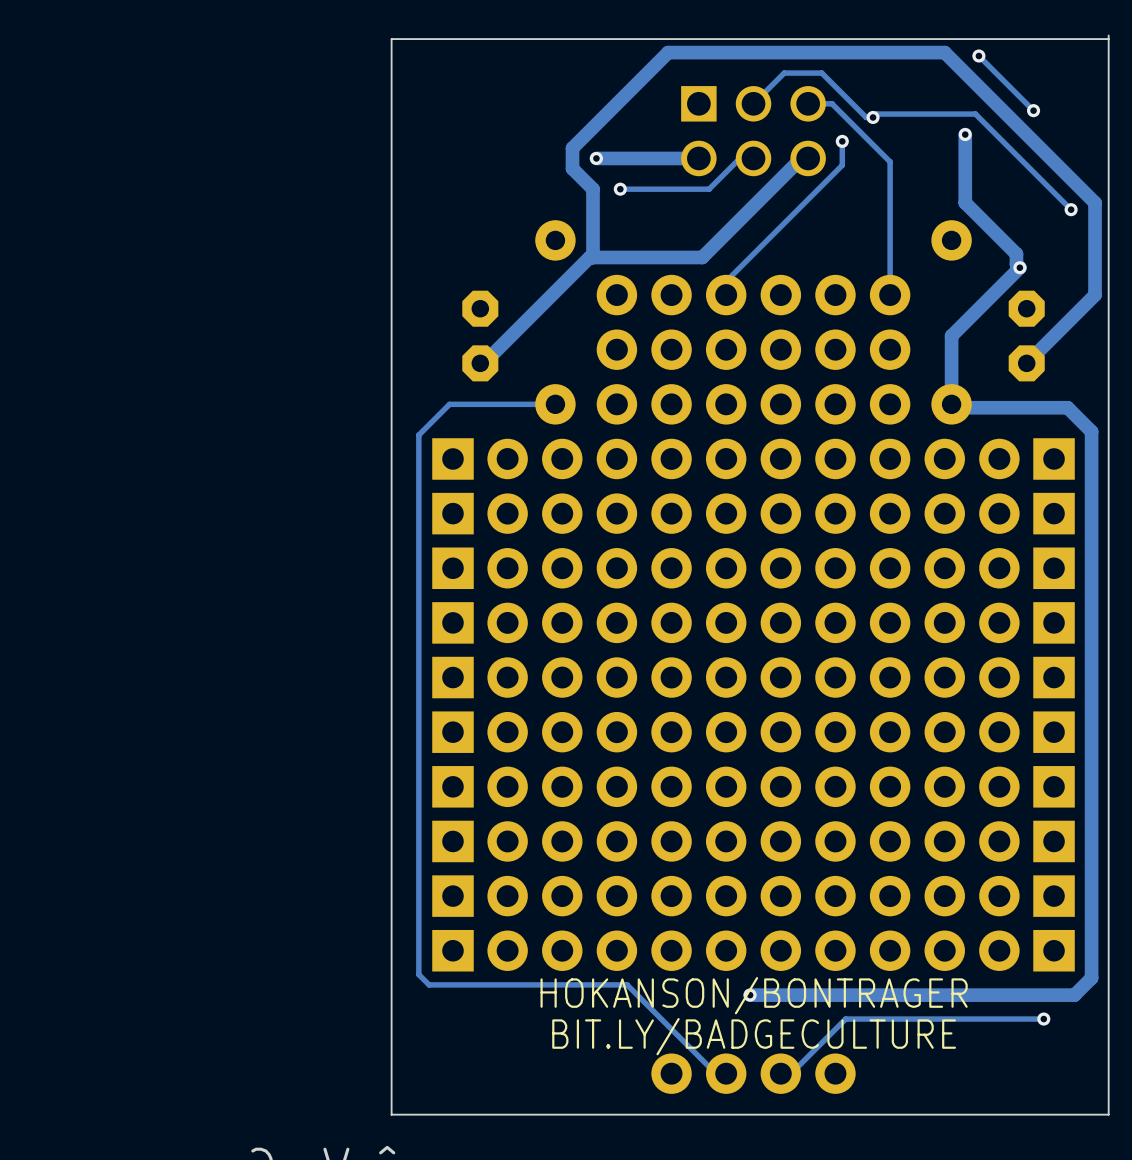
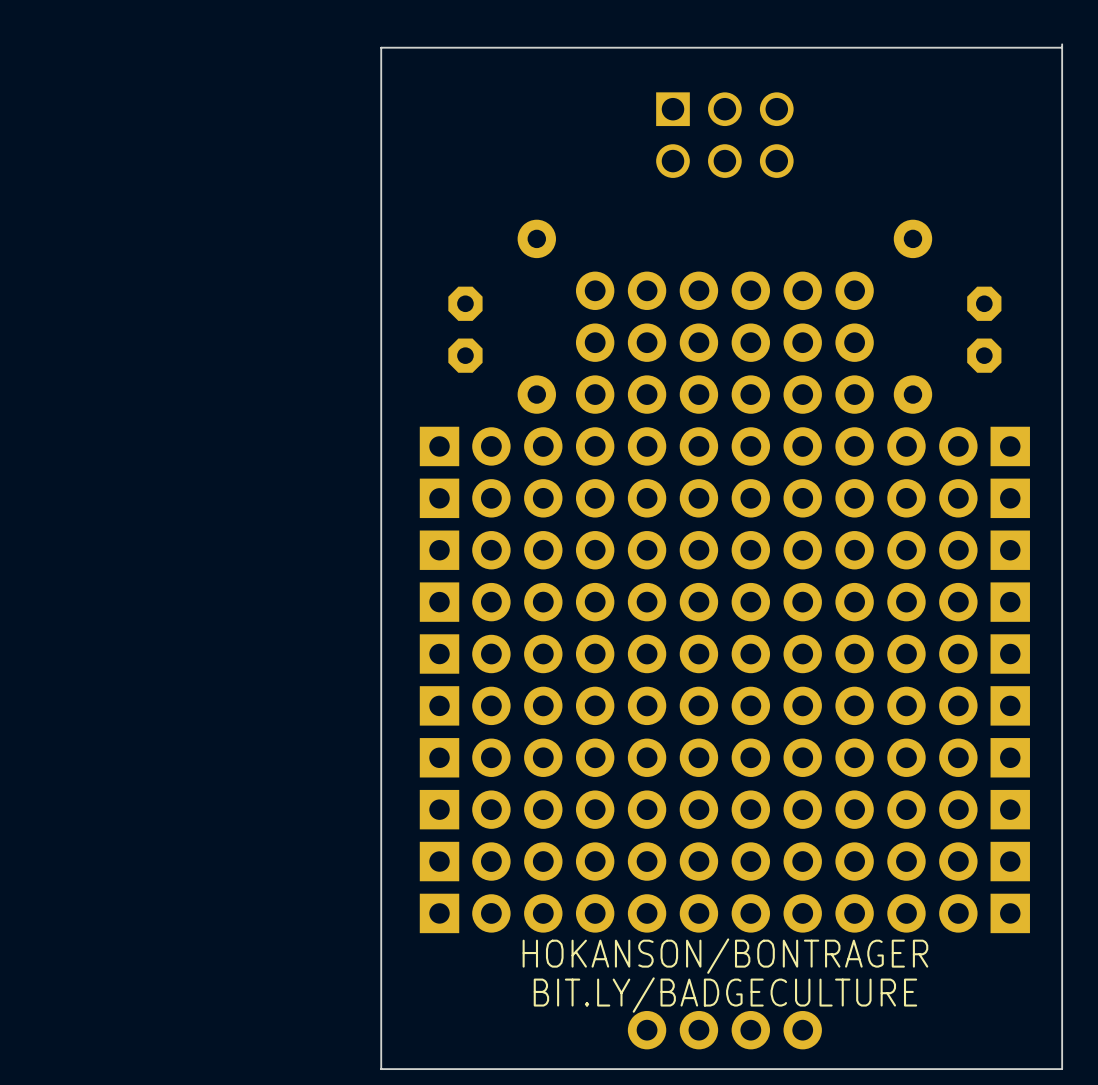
track: (978, 56) (1033, 110) -> none
via: (978, 56) -> none
track: (753, 103) (784, 73) (821, 73) (866, 117) (873, 117) (876, 114) (975, 114) (1071, 209) -> none
track: (808, 103) (832, 103) (890, 161) (890, 295) -> none
via: (1033, 110) -> none
via: (873, 117) -> none
track: (965, 134) (965, 202) (1016, 254) (1016, 264) (1019, 267) (951, 336) (951, 404) (955, 407) (1067, 407) (1091, 431) (1091, 978) (1074, 995) (750, 995) -> none
via: (965, 134) -> none
track: (842, 141) (842, 165) (726, 281) (726, 295) -> none
via: (842, 141) -> none
via: (596, 158) -> none
track: (698, 158) (596, 158) -> none
track: (753, 158) (739, 158) (709, 189) (620, 189) -> none
track: (808, 158) (801, 158) (702, 257) (589, 257) (483, 363) (480, 363) -> none
via: (620, 189) -> none
via: (1071, 209) -> none
track: (593, 257) (593, 189) (572, 168) (572, 148) (668, 52) (944, 52) (1095, 202) (1095, 295) (1026, 363) -> none
via: (1019, 267) -> none
track: (555, 404) (449, 404) (418, 435) (418, 974) (429, 984) (627, 984) (715, 1073) (726, 1073) -> none
via: (750, 995) -> none
track: (1043, 1019) (845, 1019) (791, 1073) (780, 1073) -> none
via: (1043, 1019) -> none

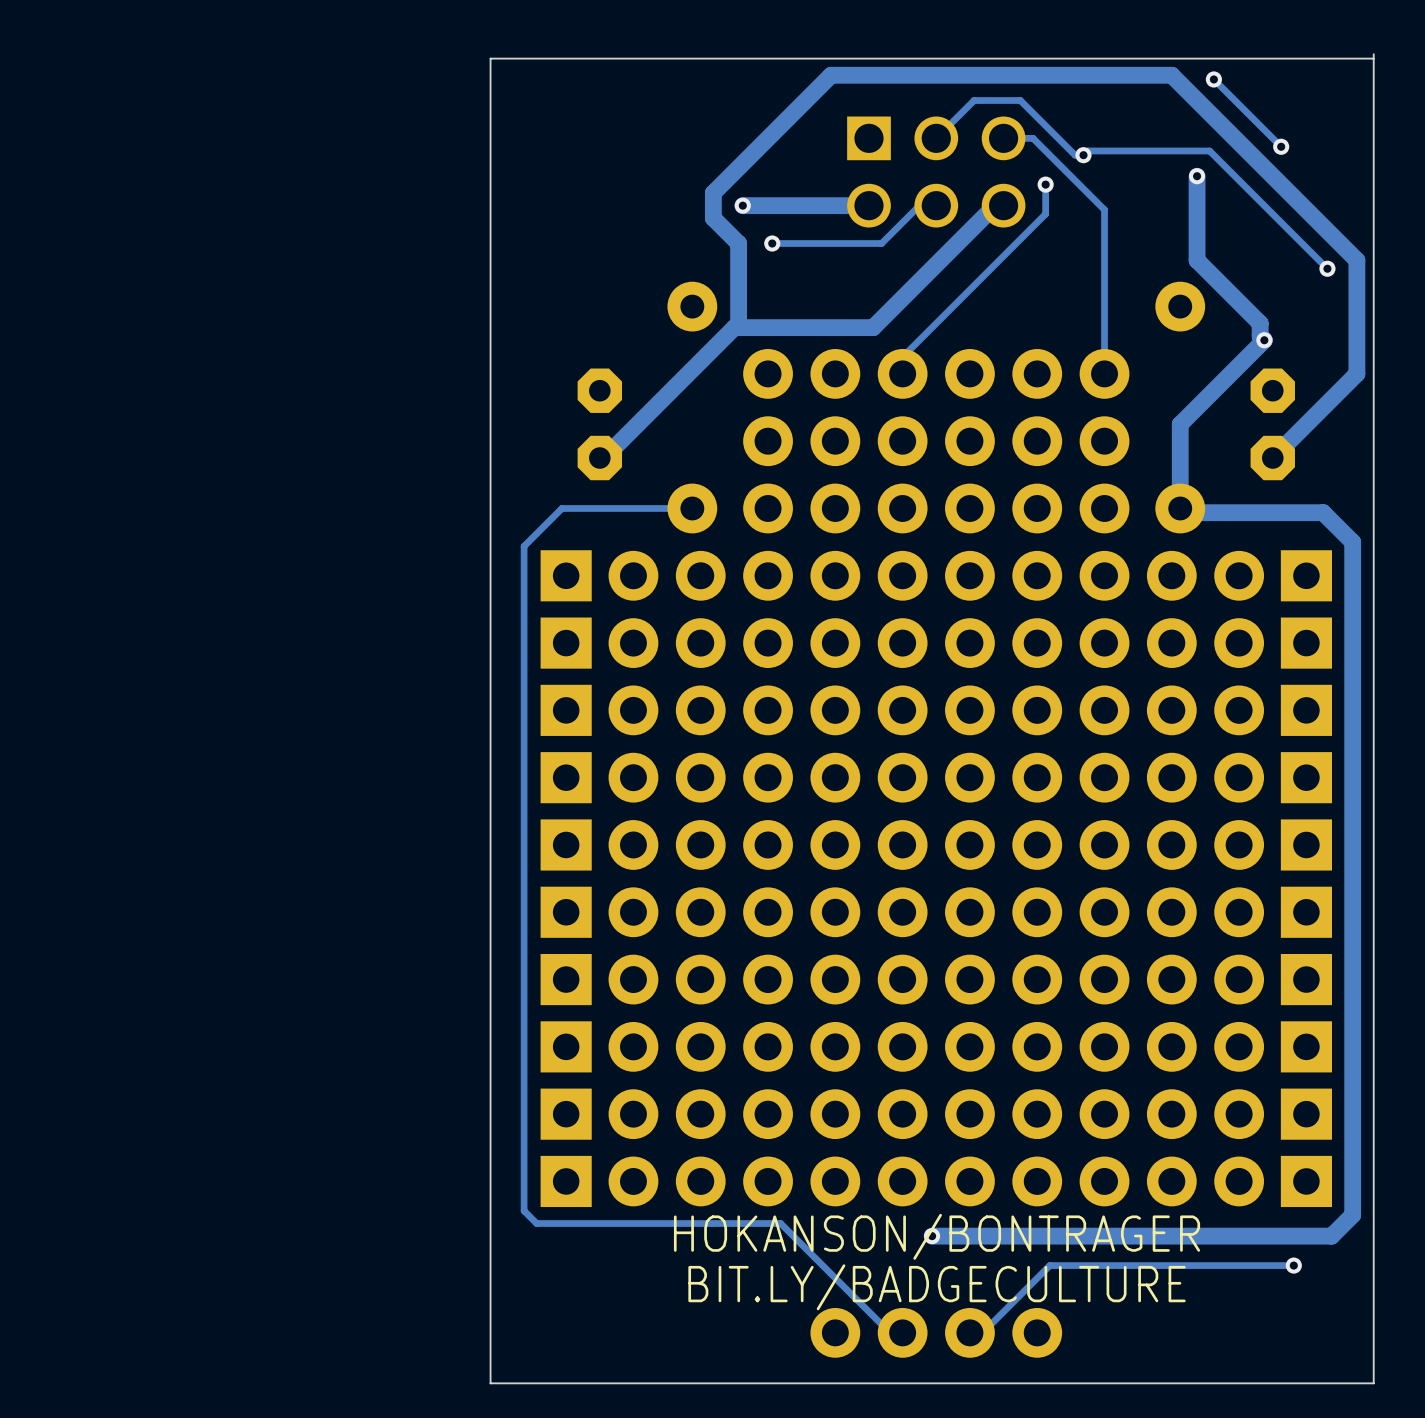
track: none -> (1213, 79) (1281, 146)
via: none -> (1213, 79)
track: none -> (936, 138) (974, 100) (1020, 100) (1075, 155) (1083, 155) (1087, 150) (1209, 150) (1327, 268)
track: none -> (1003, 138) (1033, 138) (1104, 209) (1104, 373)
via: none -> (1281, 146)
via: none -> (1083, 155)
track: none -> (1197, 176) (1197, 260) (1260, 323) (1260, 336) (1264, 340) (1180, 424) (1180, 508) (1184, 512) (1323, 512) (1352, 542) (1352, 1215) (1331, 1236) (932, 1236)
via: none -> (1197, 176)
track: none -> (1045, 184) (1045, 214) (902, 357) (902, 373)
via: none -> (1045, 184)
via: none -> (742, 205)
track: none -> (868, 205) (742, 205)
track: none -> (936, 205) (919, 205) (881, 243) (772, 243)
track: none -> (1003, 205) (995, 205) (873, 327) (734, 327) (604, 458) (599, 458)
via: none -> (772, 243)
via: none -> (1327, 268)
track: none -> (738, 327) (738, 243) (713, 218) (713, 193) (831, 75) (1171, 75) (1356, 260) (1356, 373) (1272, 458)
via: none -> (1264, 340)
track: none -> (692, 508) (561, 508) (524, 546) (524, 1210) (536, 1223) (780, 1223) (890, 1332) (902, 1332)
via: none -> (932, 1236)
track: none -> (1293, 1265) (1049, 1265) (982, 1332) (969, 1332)
via: none -> (1293, 1265)

